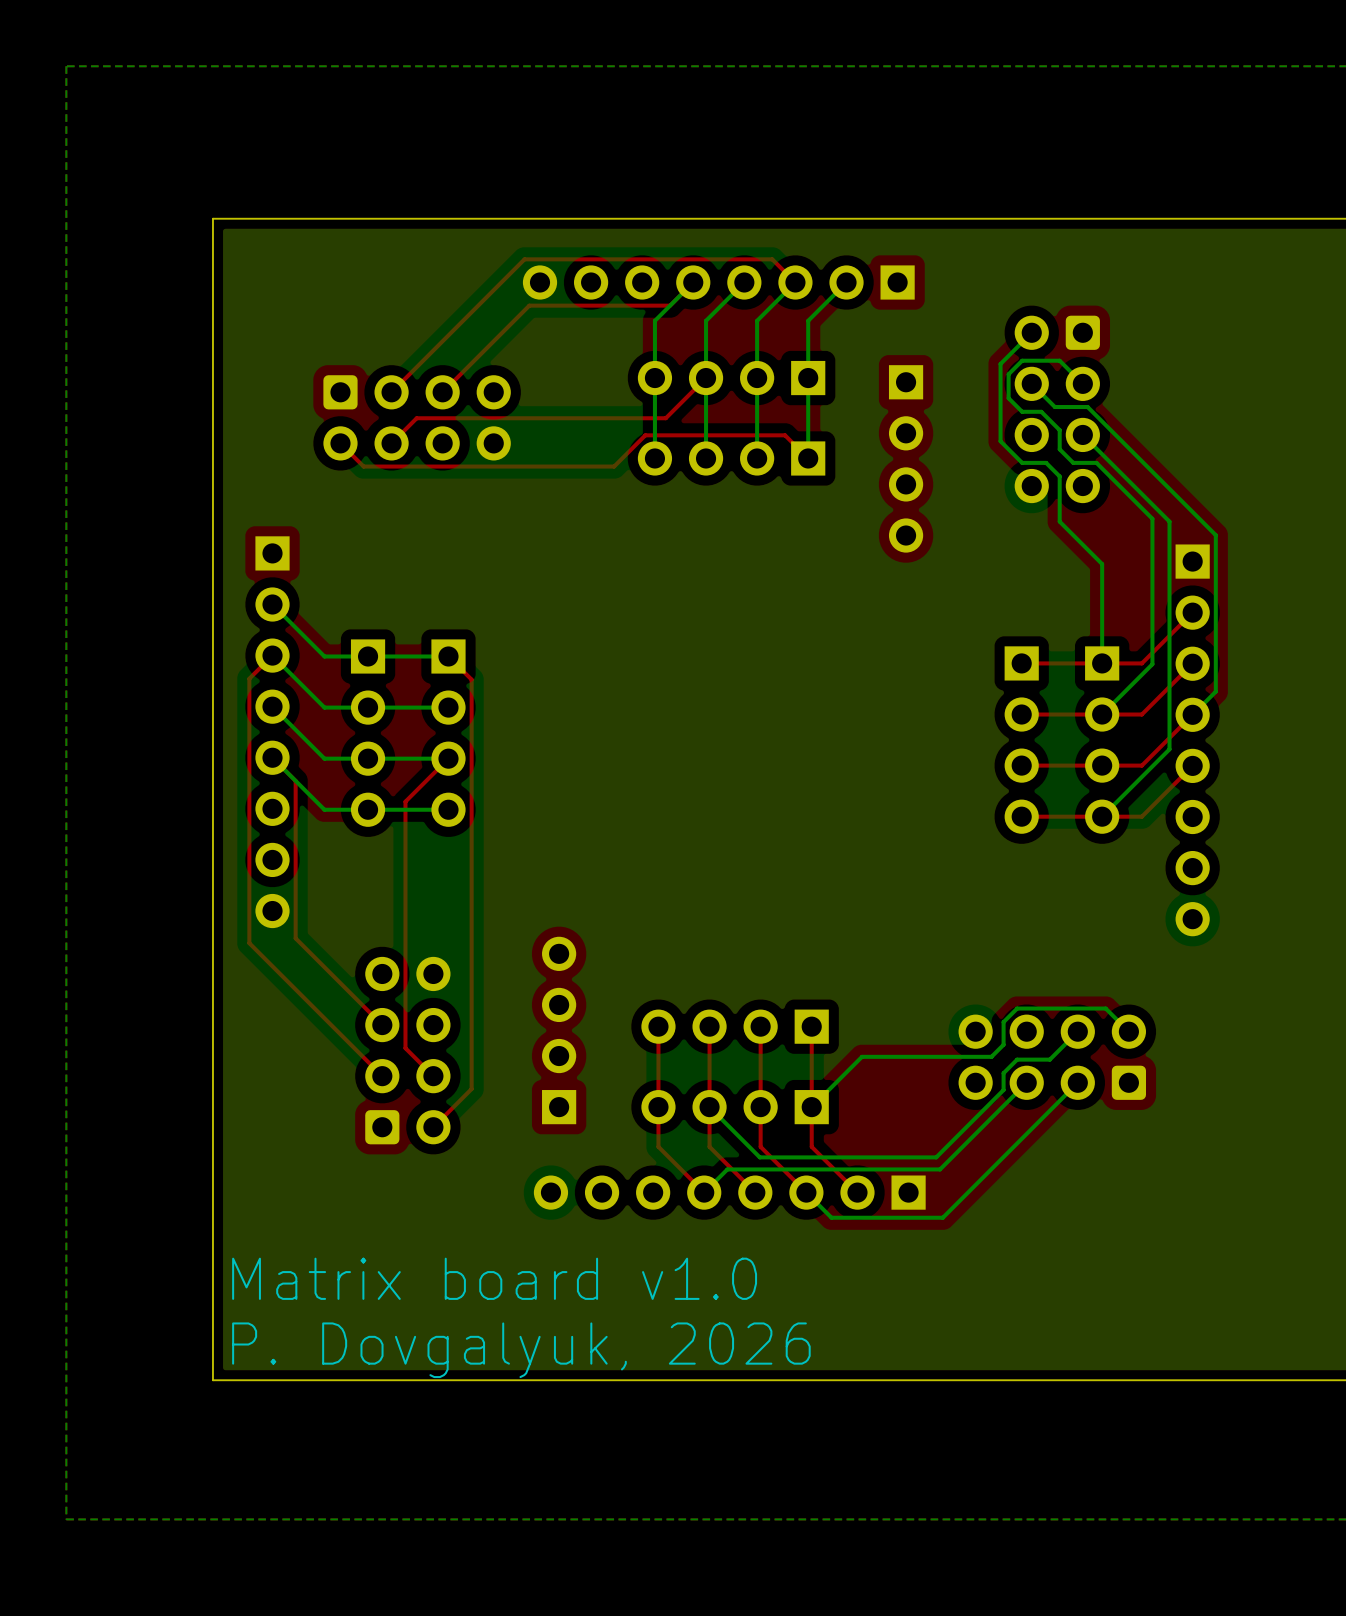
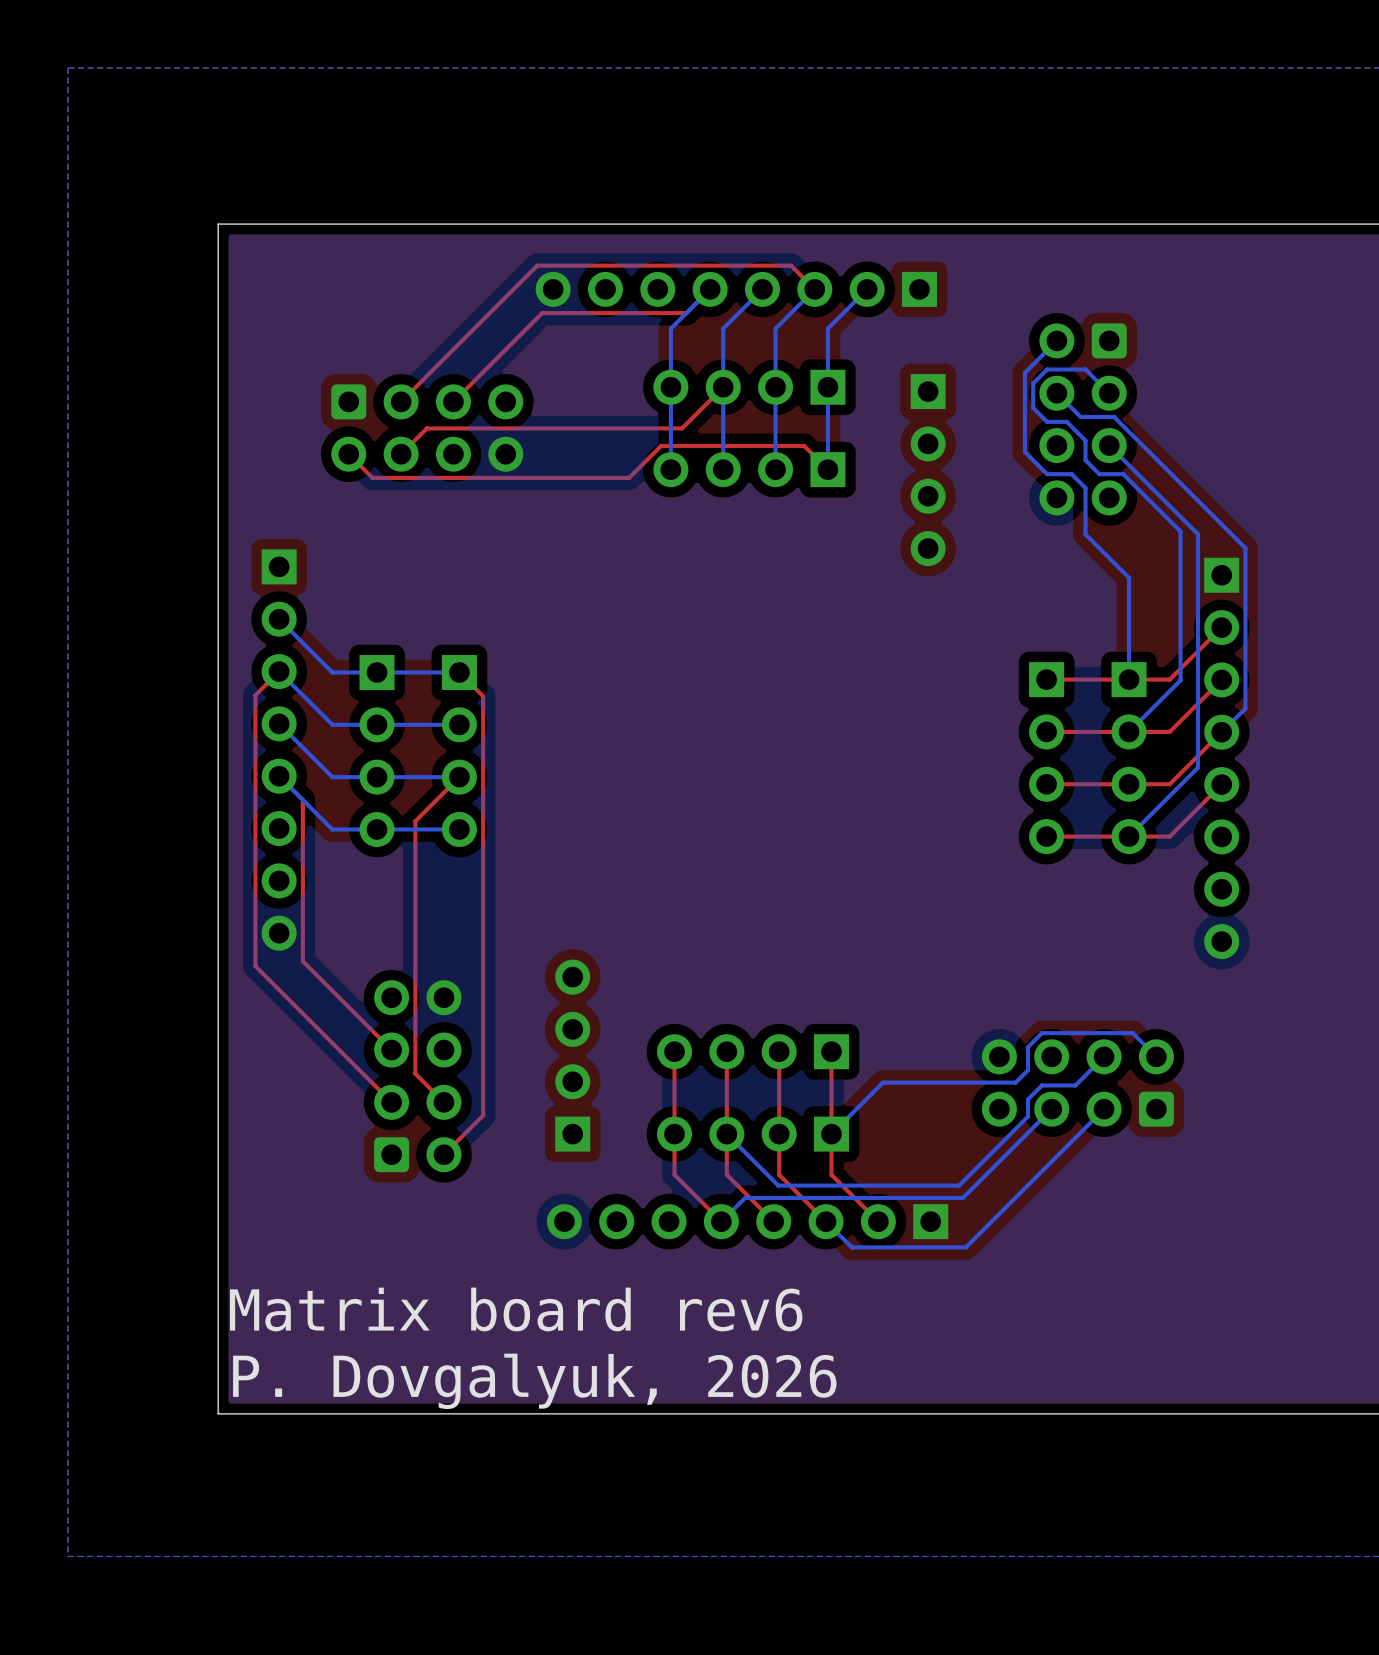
text: Matrix board v1.0 (494, 1278) -> Matrix board rev6 (516, 1309)

